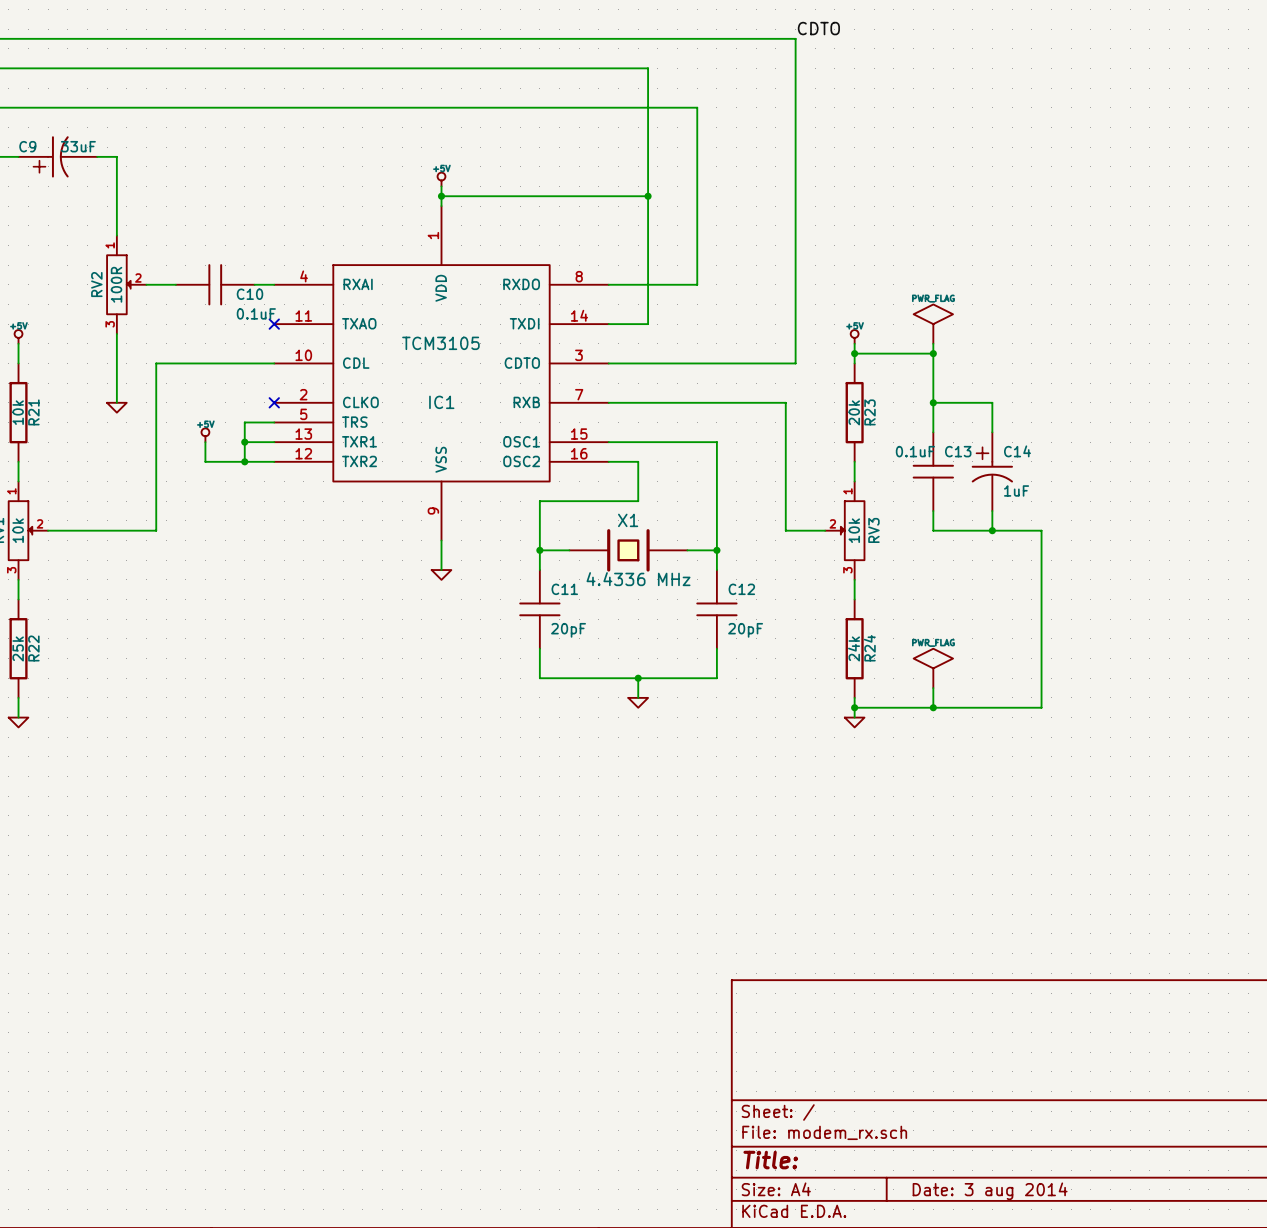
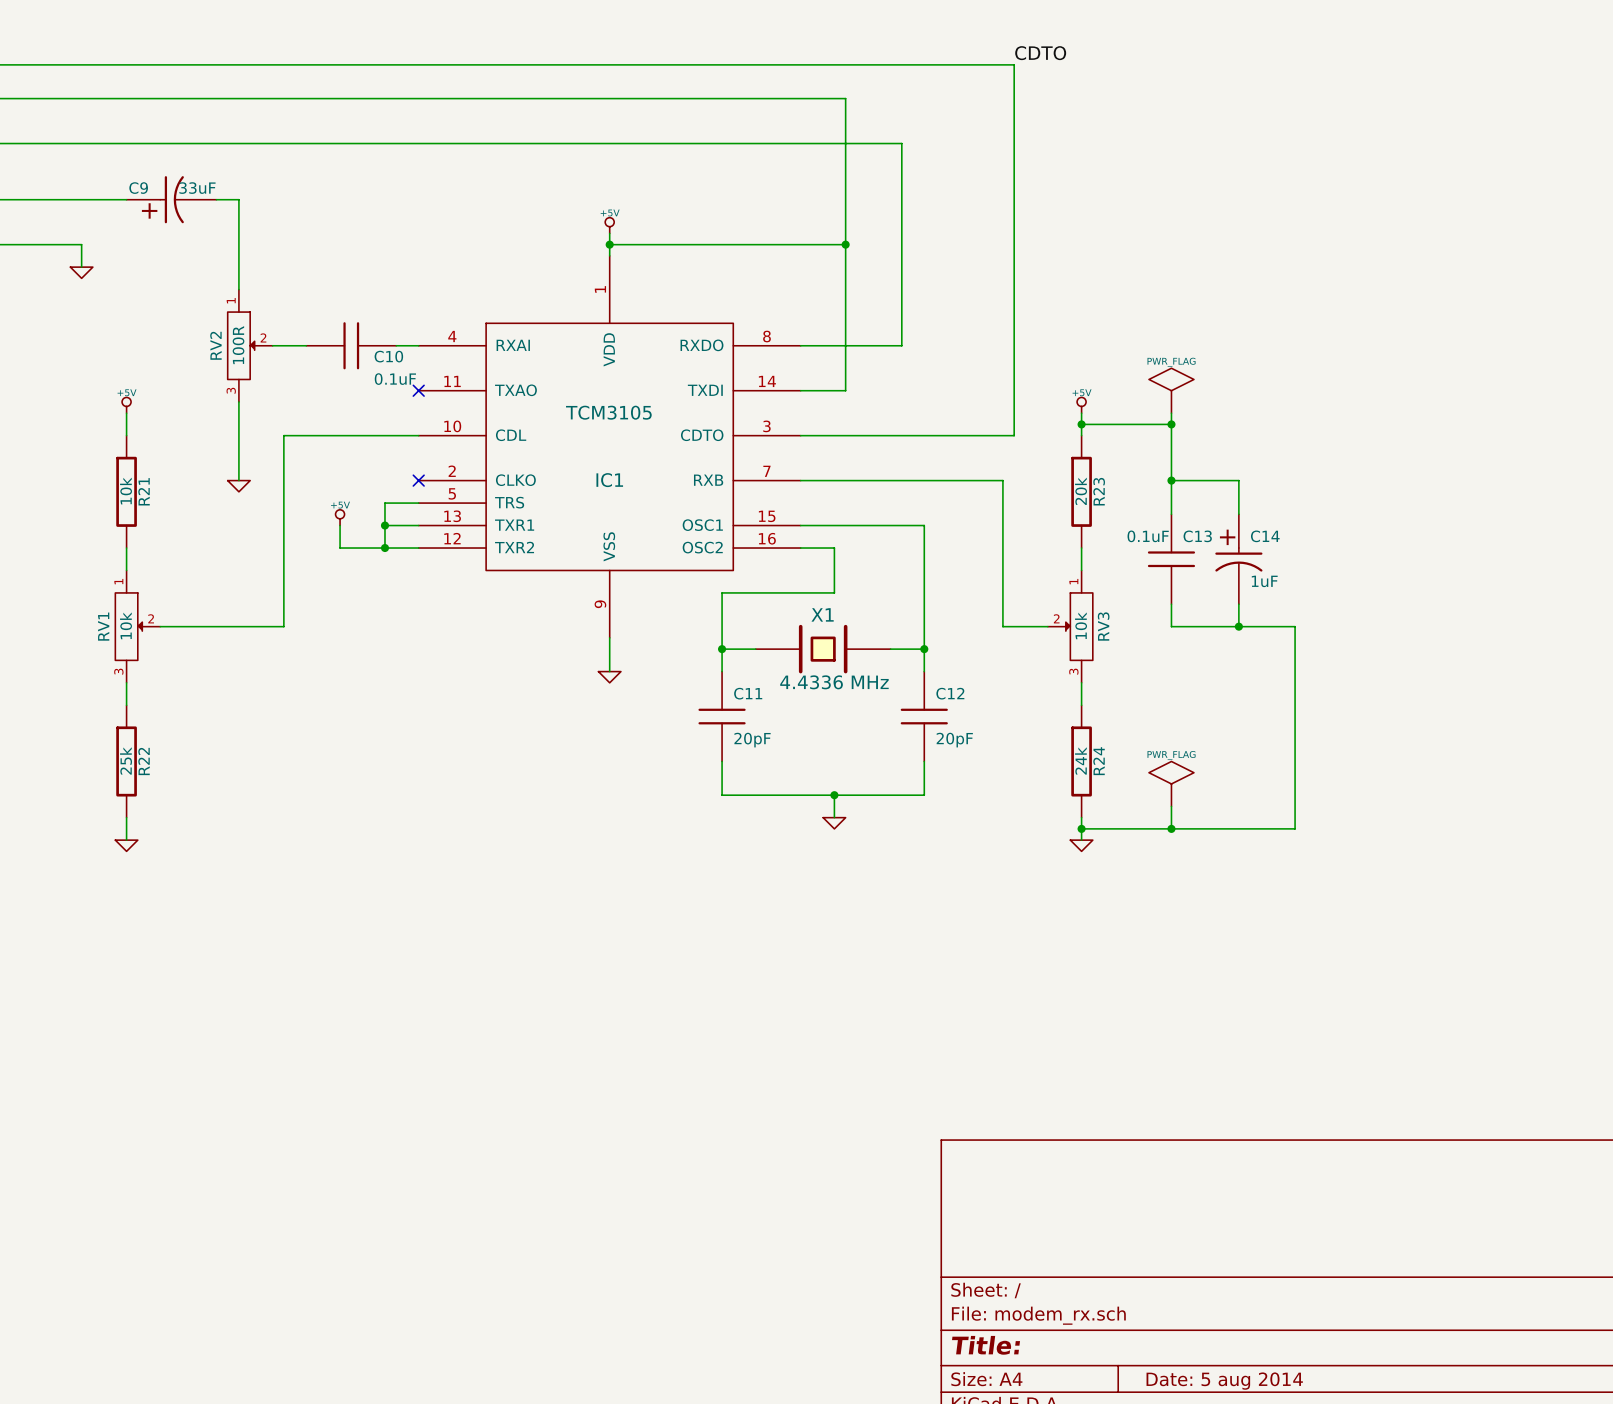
title block: Date: 3 aug 2014 (990, 1191) -> Date: 5 aug 2014 (1224, 1381)

